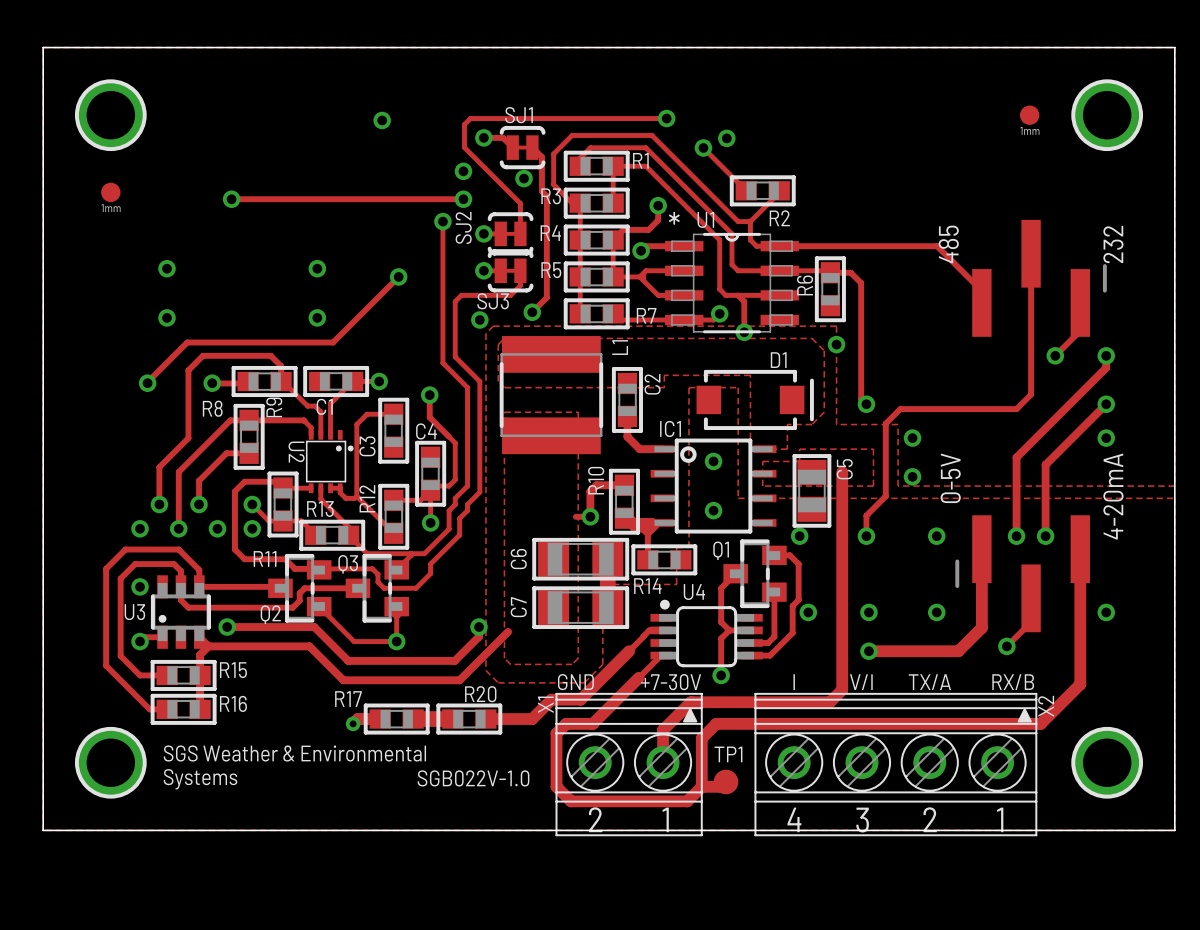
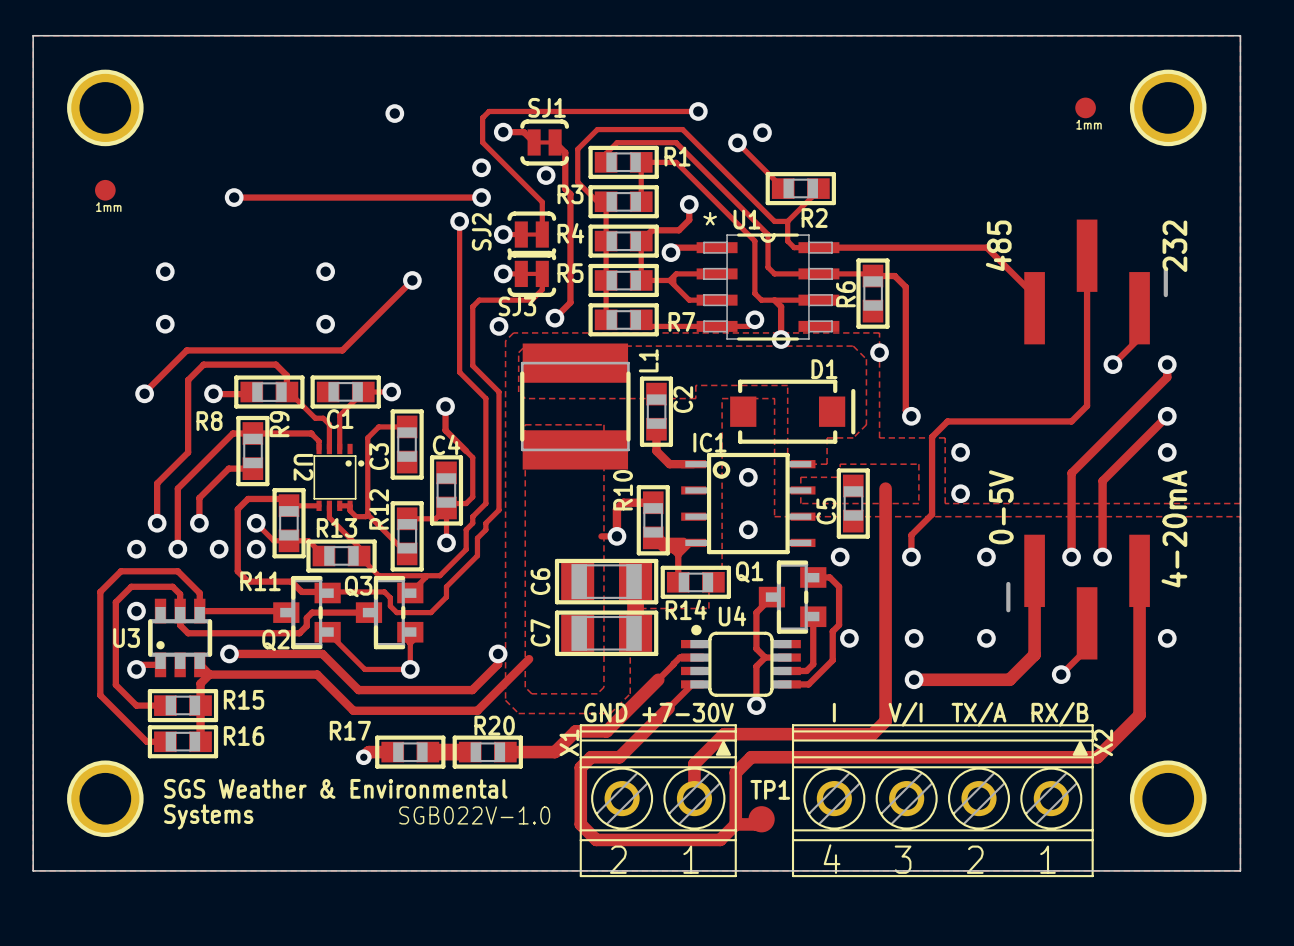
C5 footprint: [792, 454, 832, 528] -> [836, 468, 870, 539]
C5 name position: C5 (844, 469) -> C5 (826, 511)

